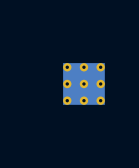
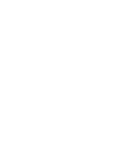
part: (83, 83) -> none

